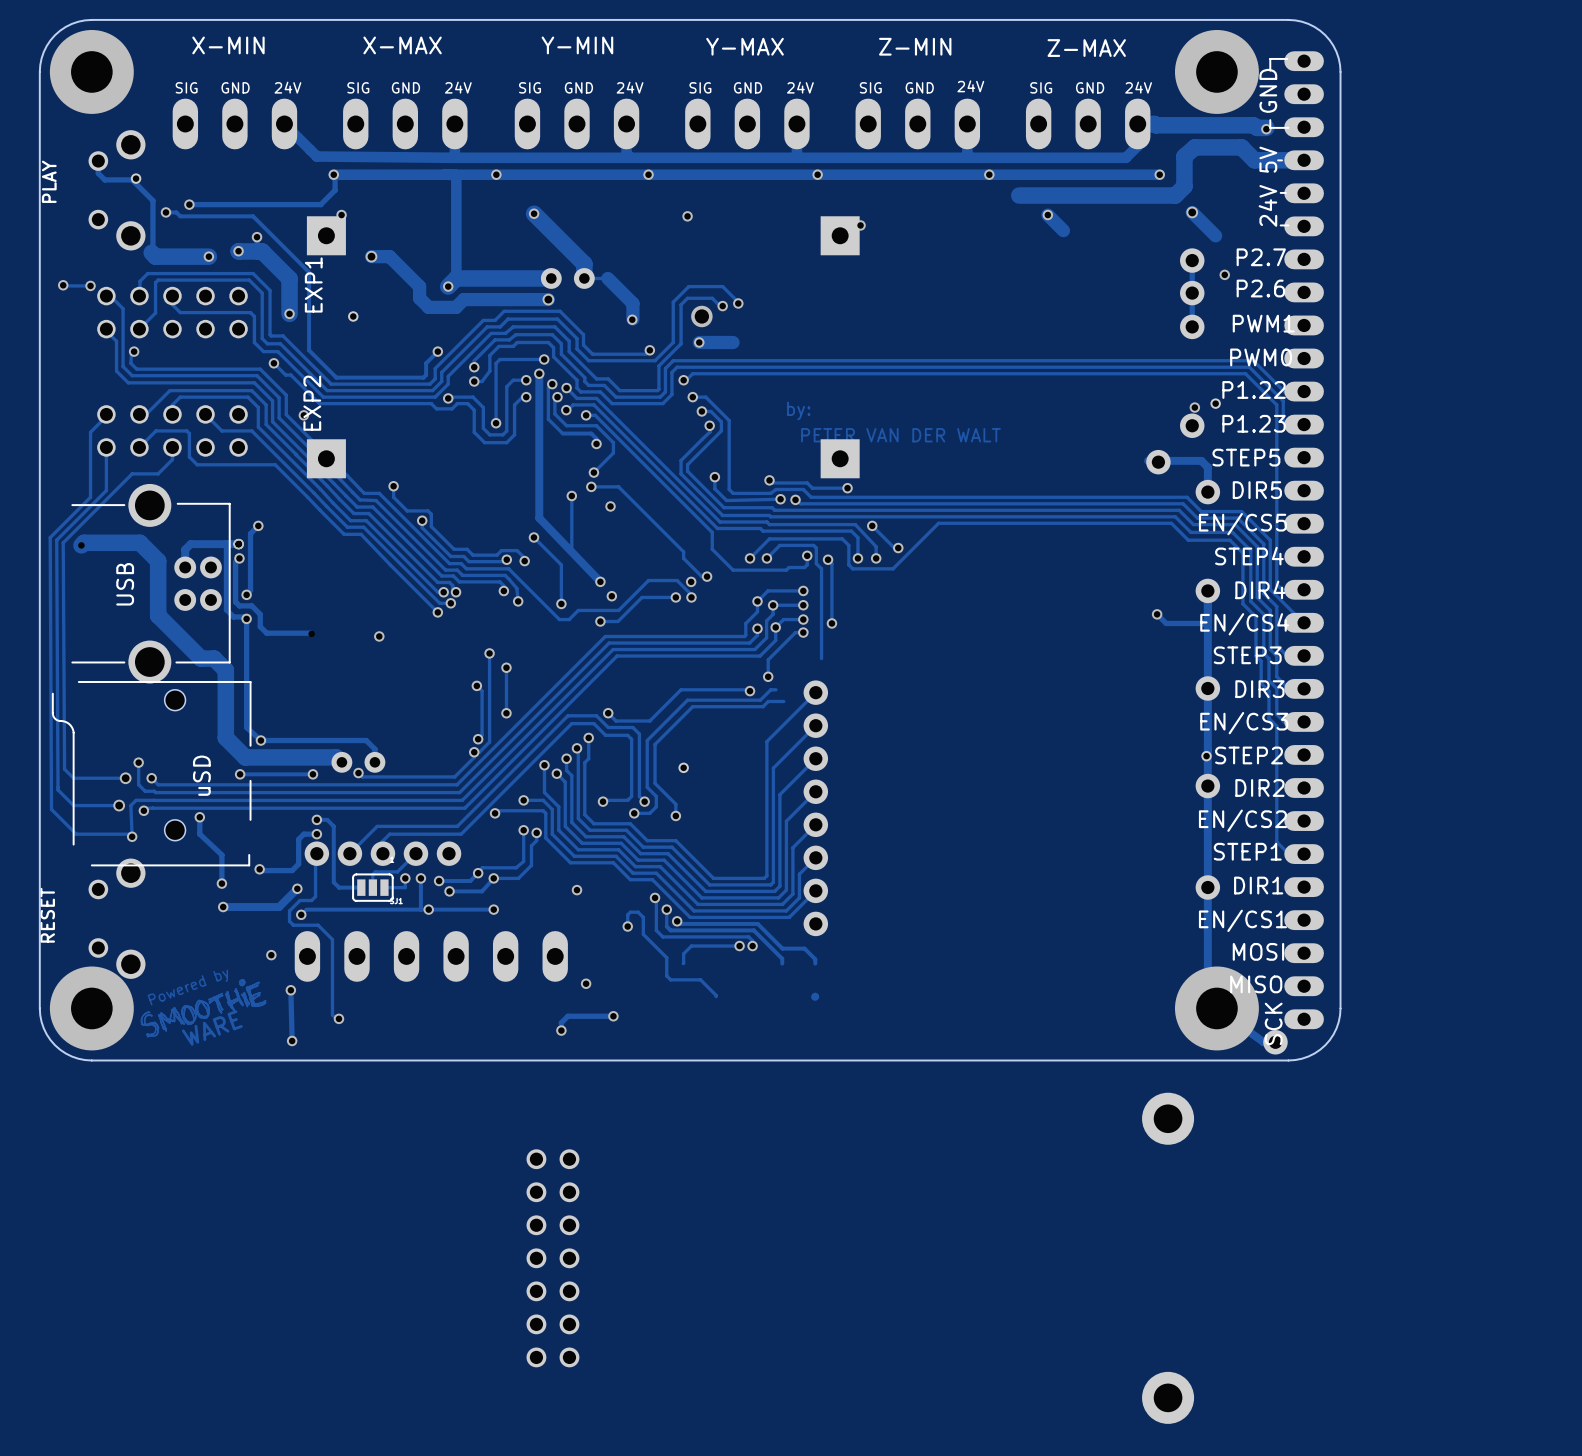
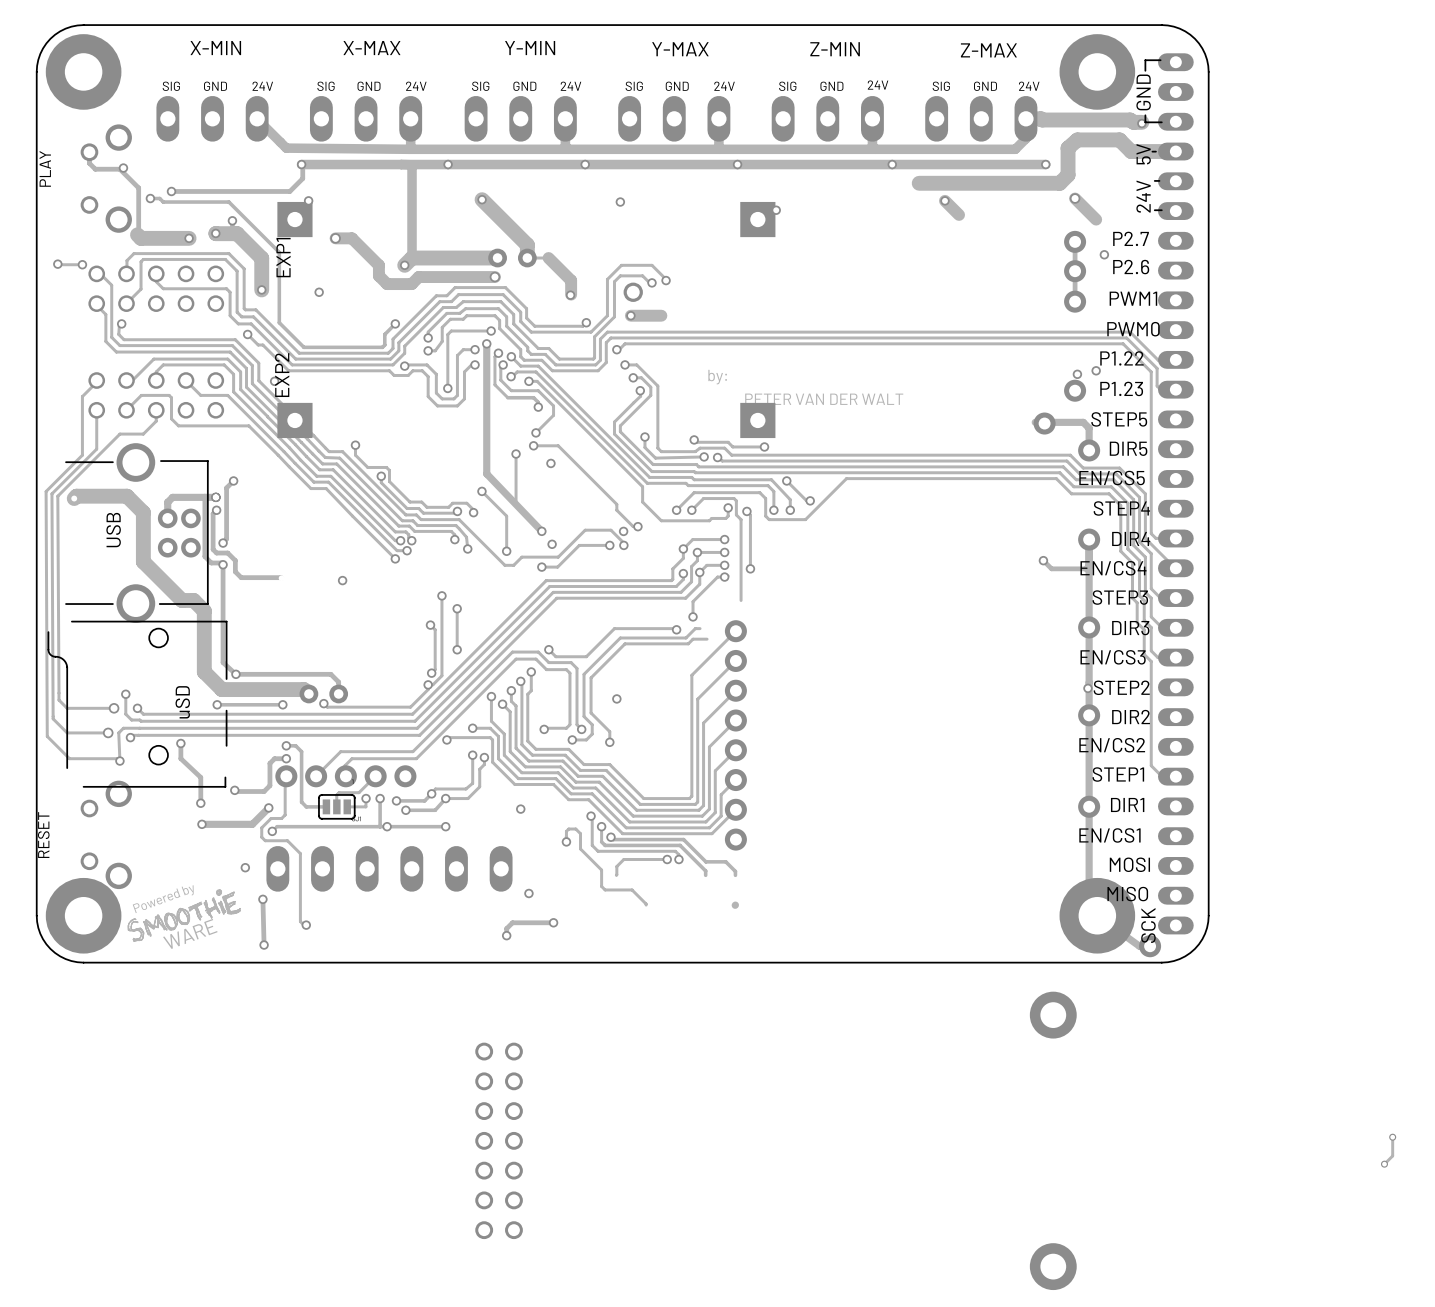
track: none -> (1392, 1137) (1392, 1155) (1384, 1164)
via: none -> (1392, 1137)
via: none -> (1384, 1164)

